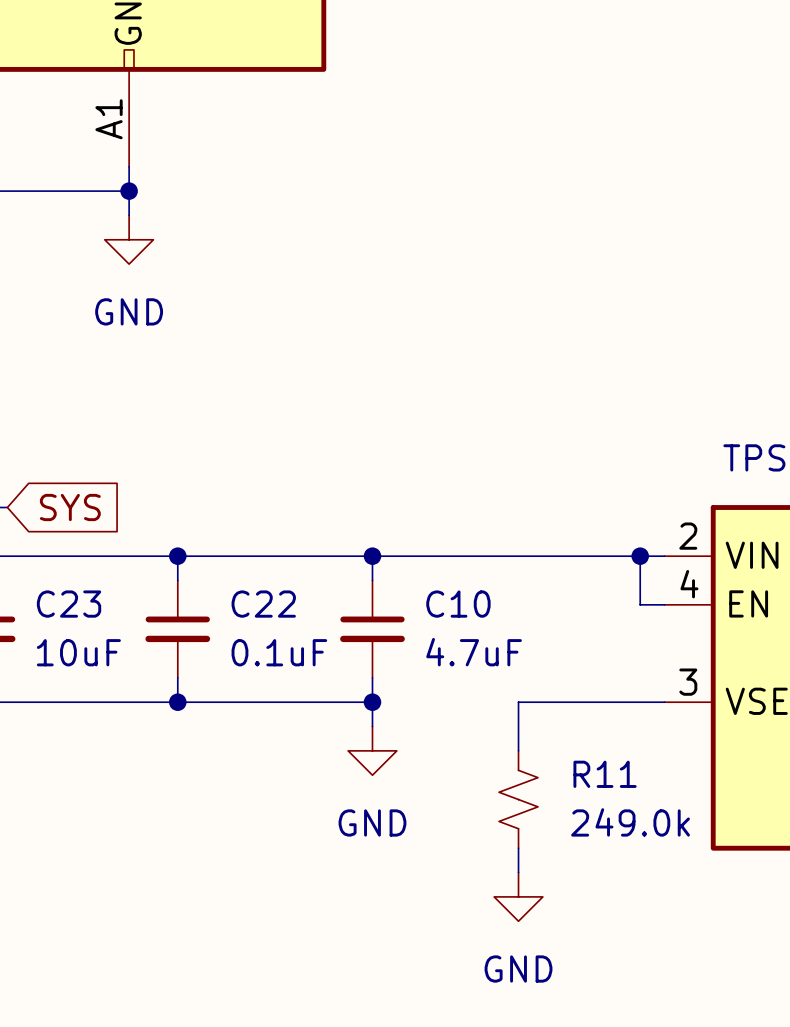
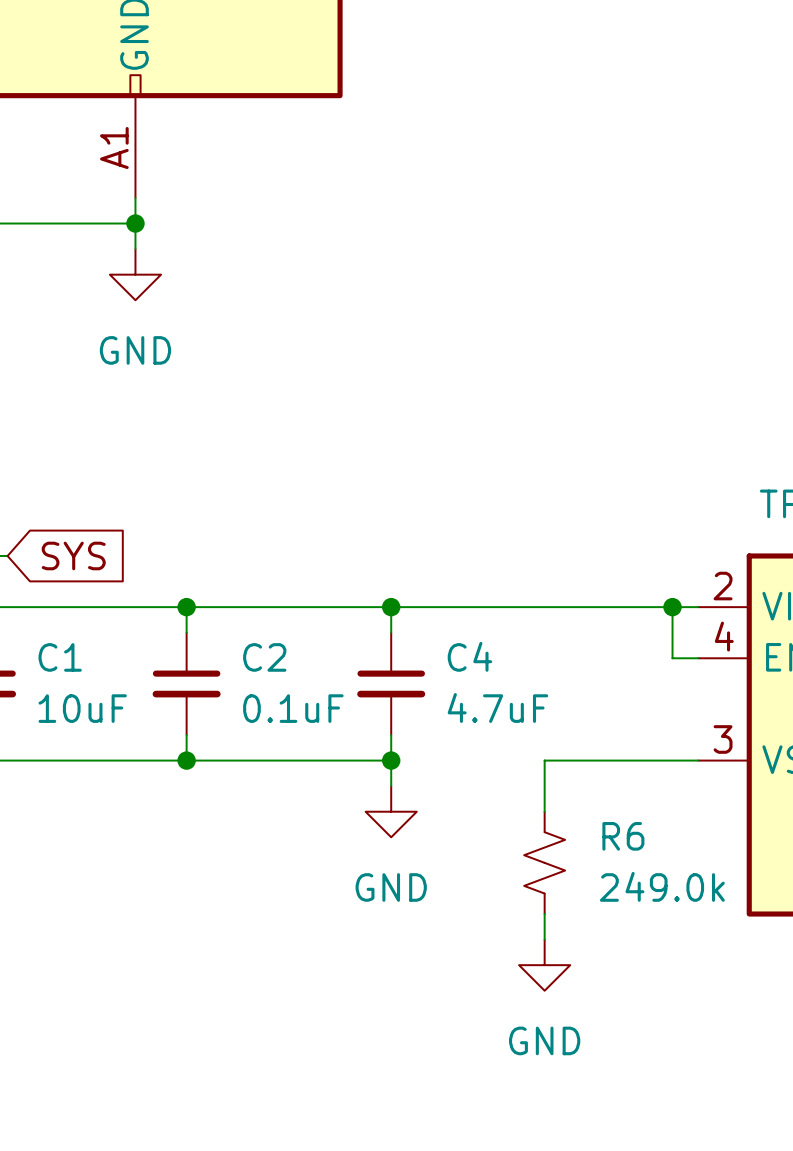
C23 name: C23 (69, 604) -> C1 (60, 657)
C22 name: C22 (263, 604) -> C2 (264, 657)
C10 name: C10 (458, 604) -> C4 (469, 656)
R11 name: R11 (605, 774) -> R6 (623, 836)

